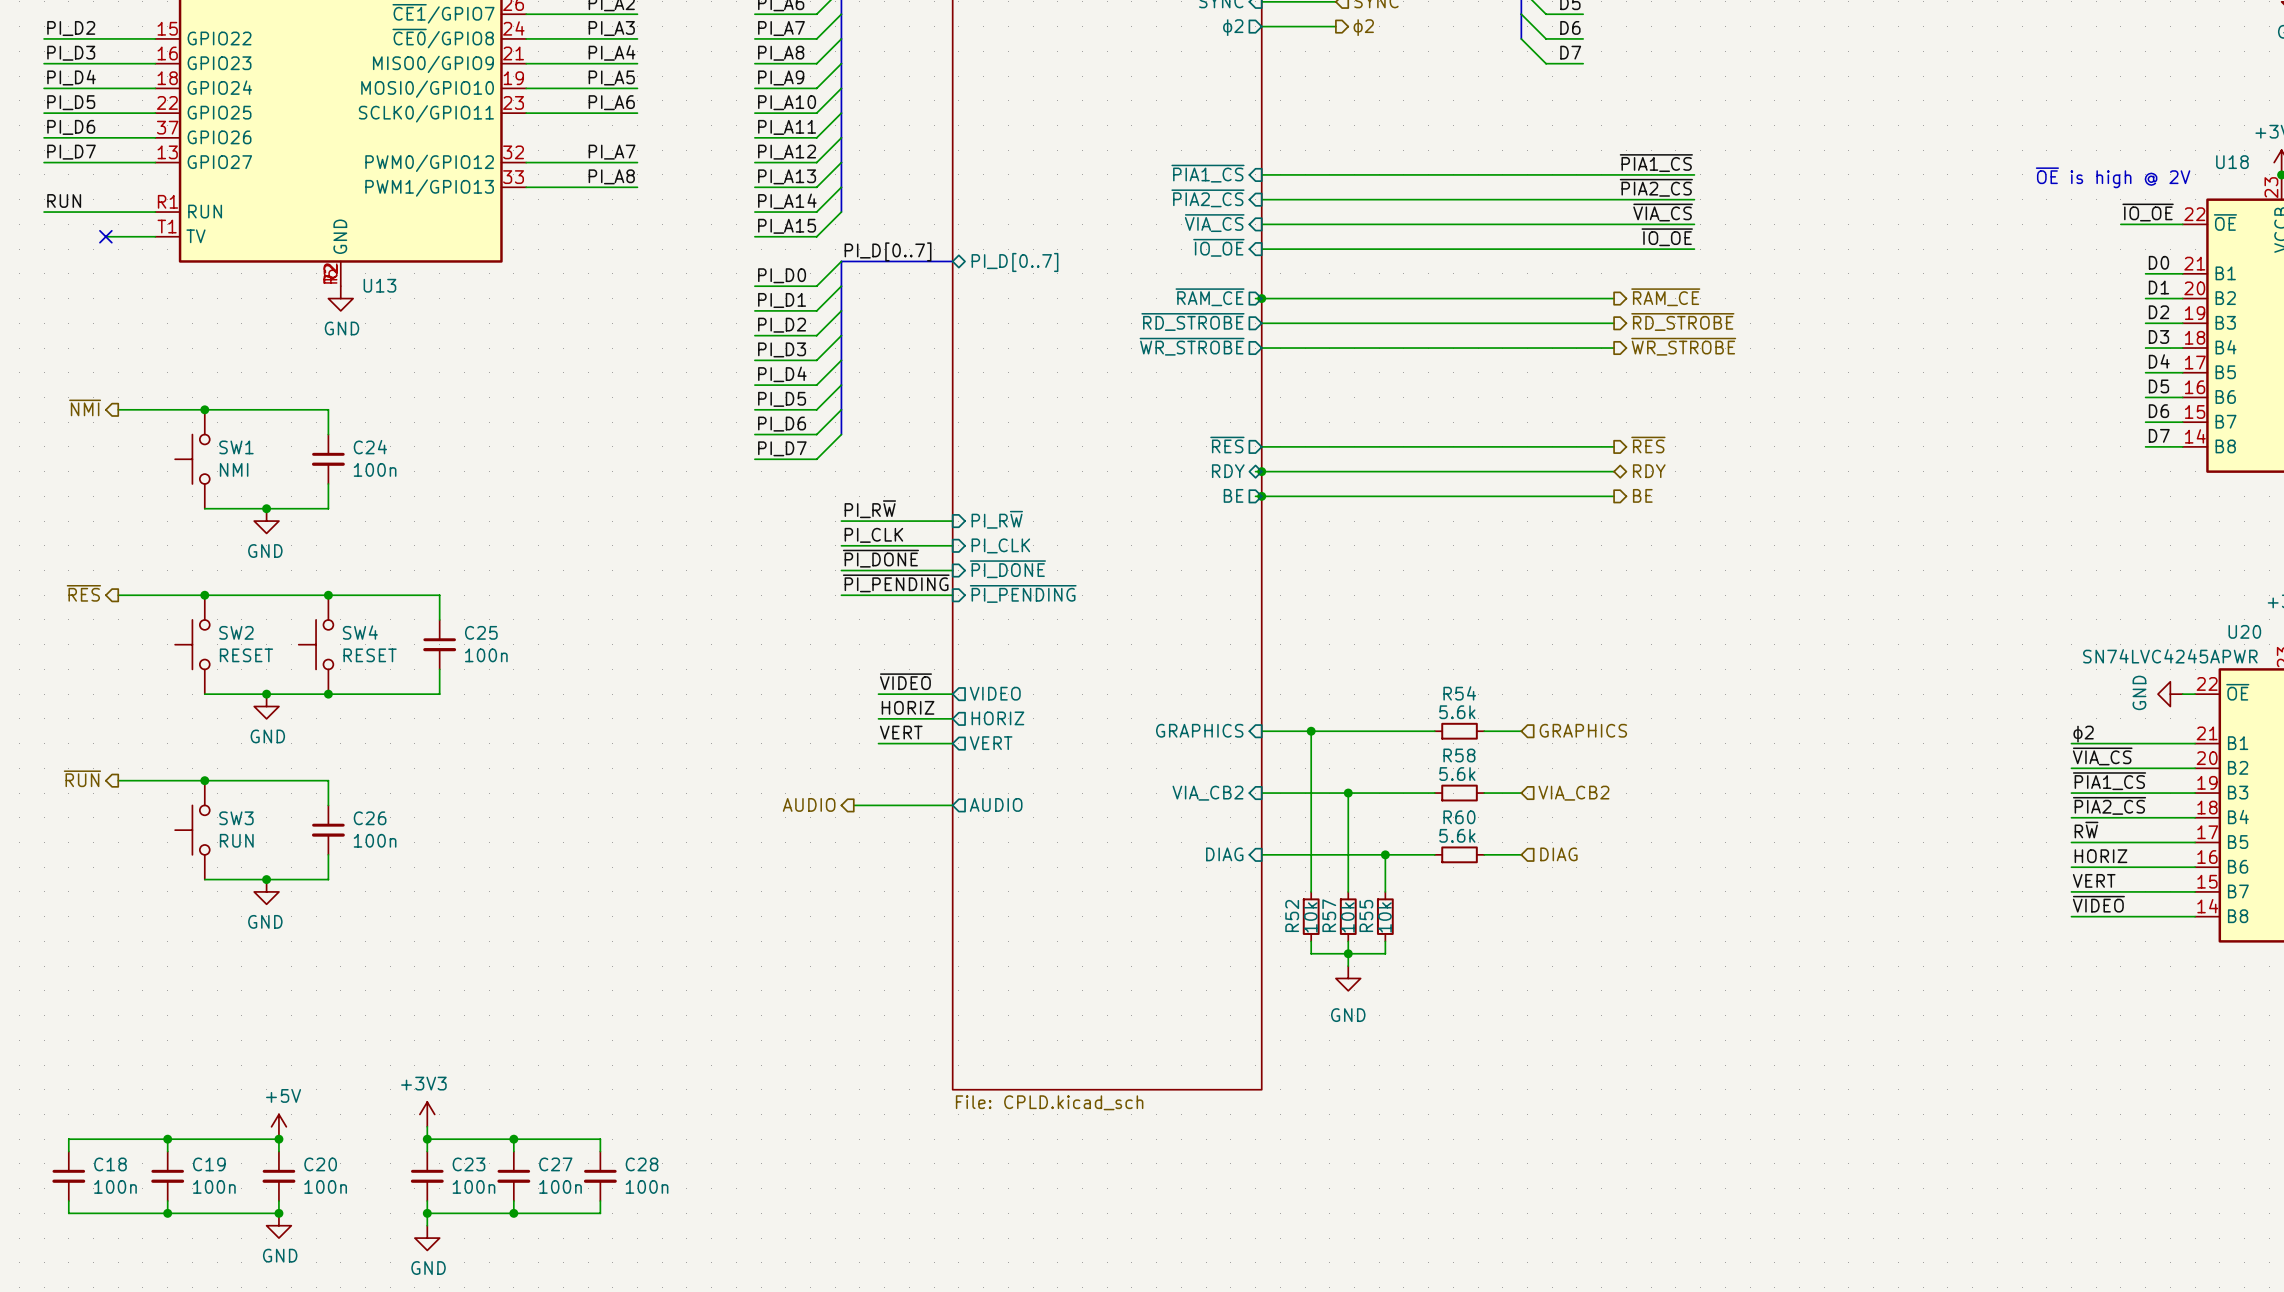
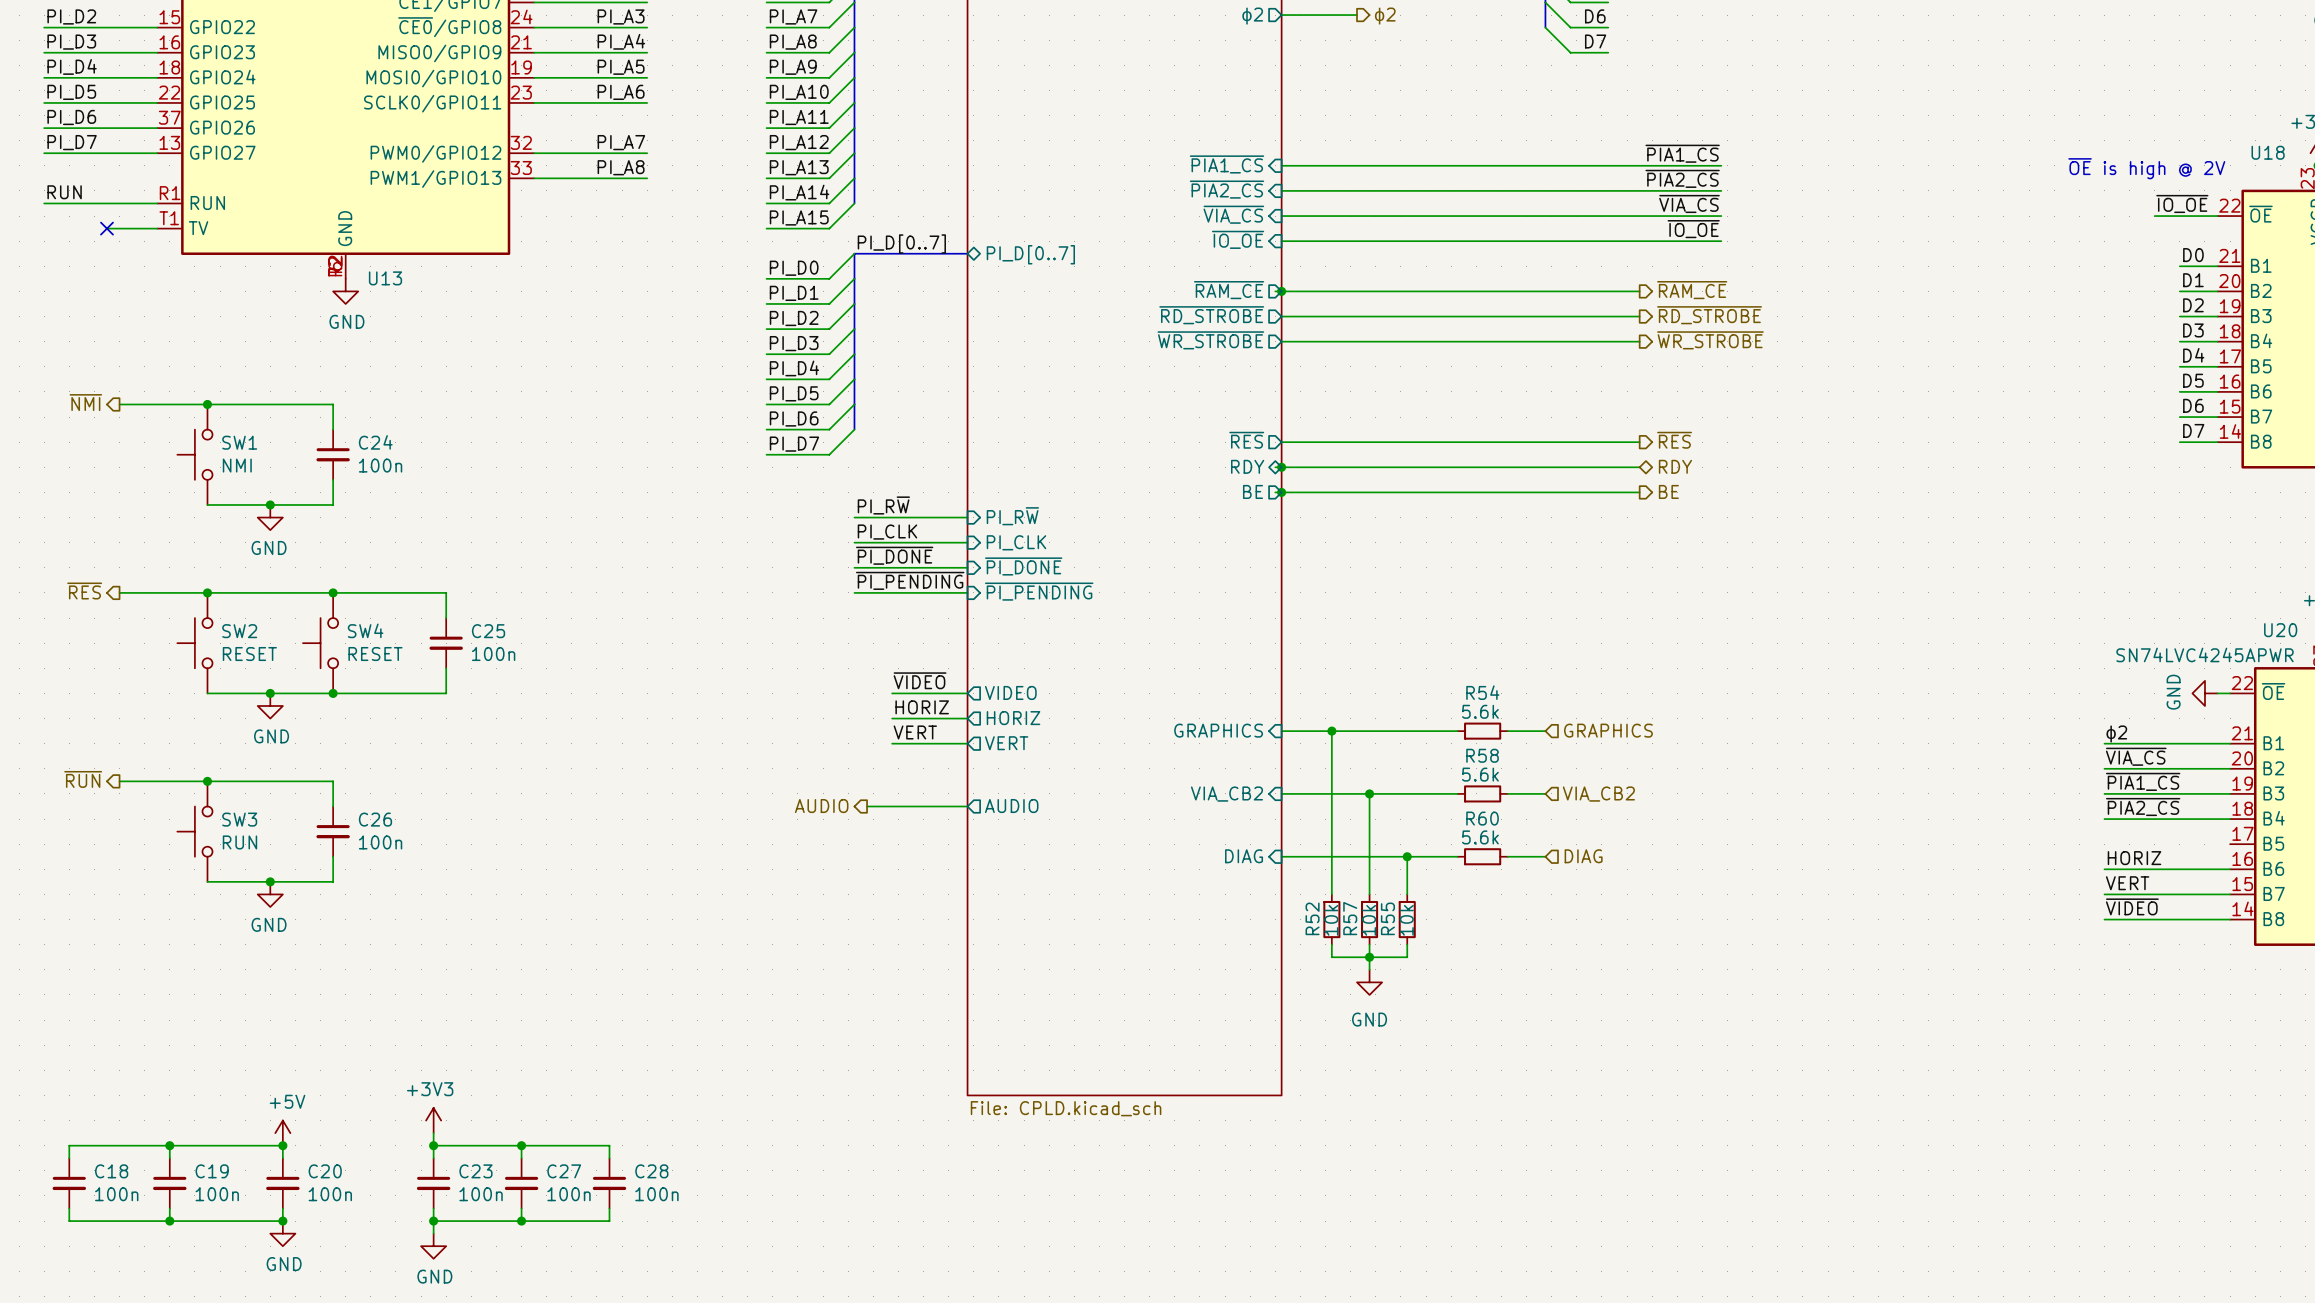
label: R~{W} (2086, 830) -> none
wire: (2071, 842) (2195, 842) -> none

